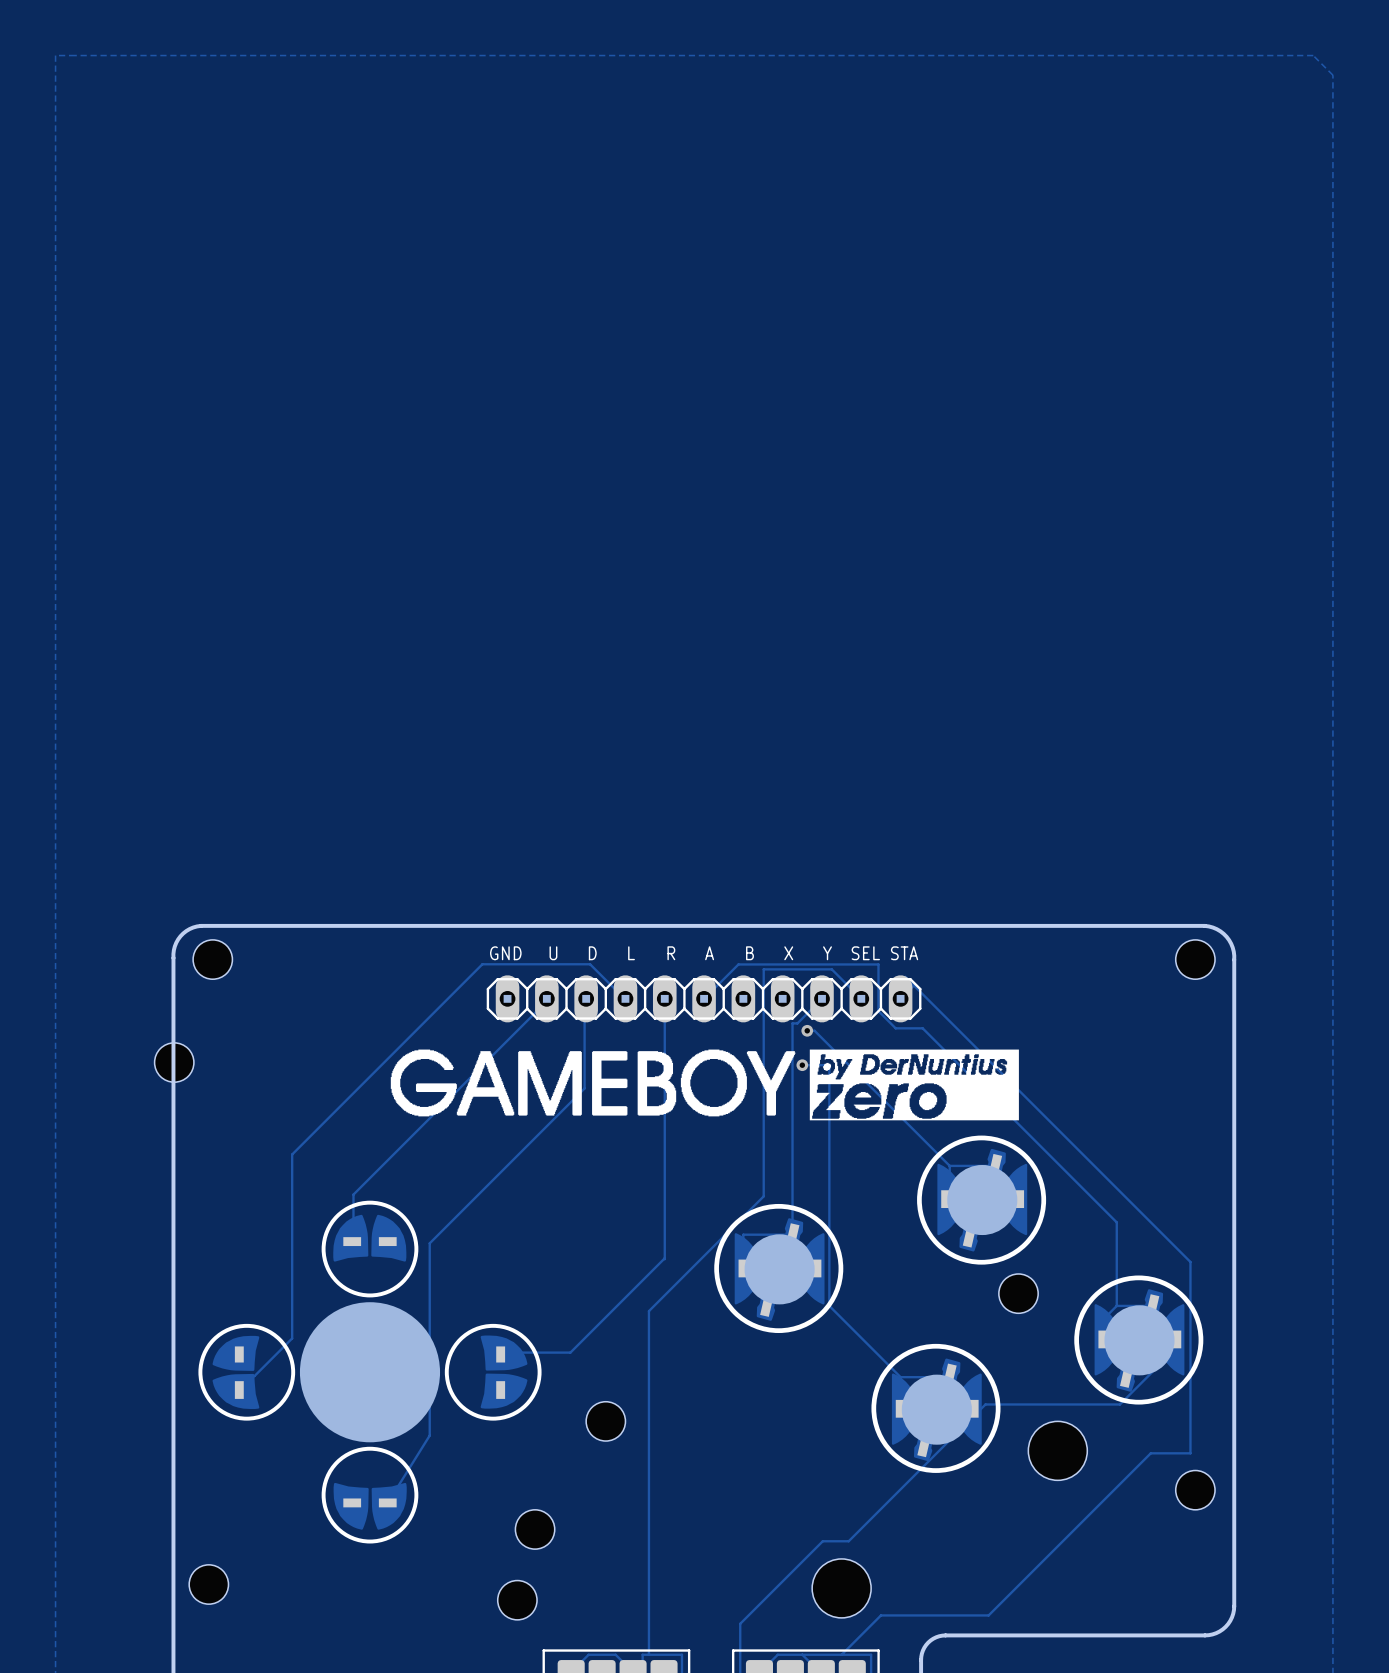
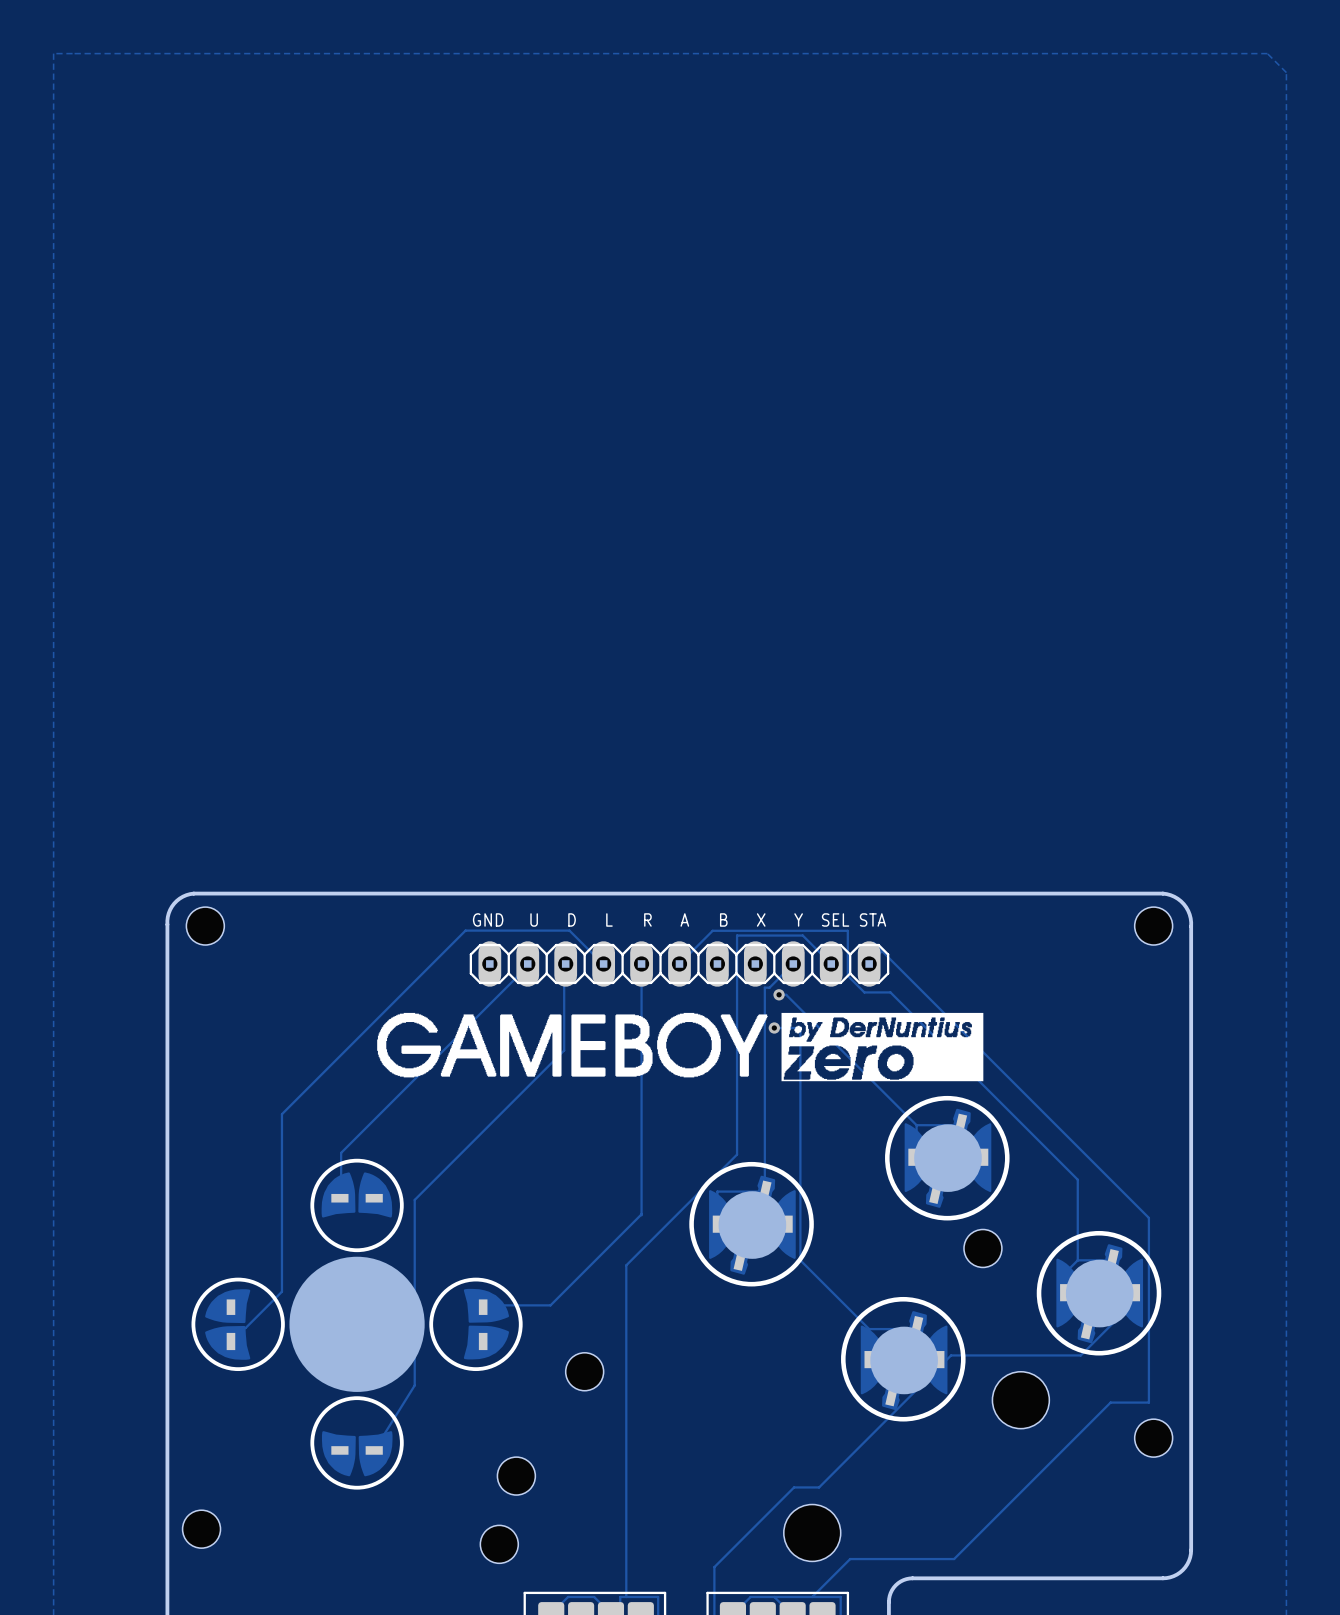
hole: (174, 1062) -> none

